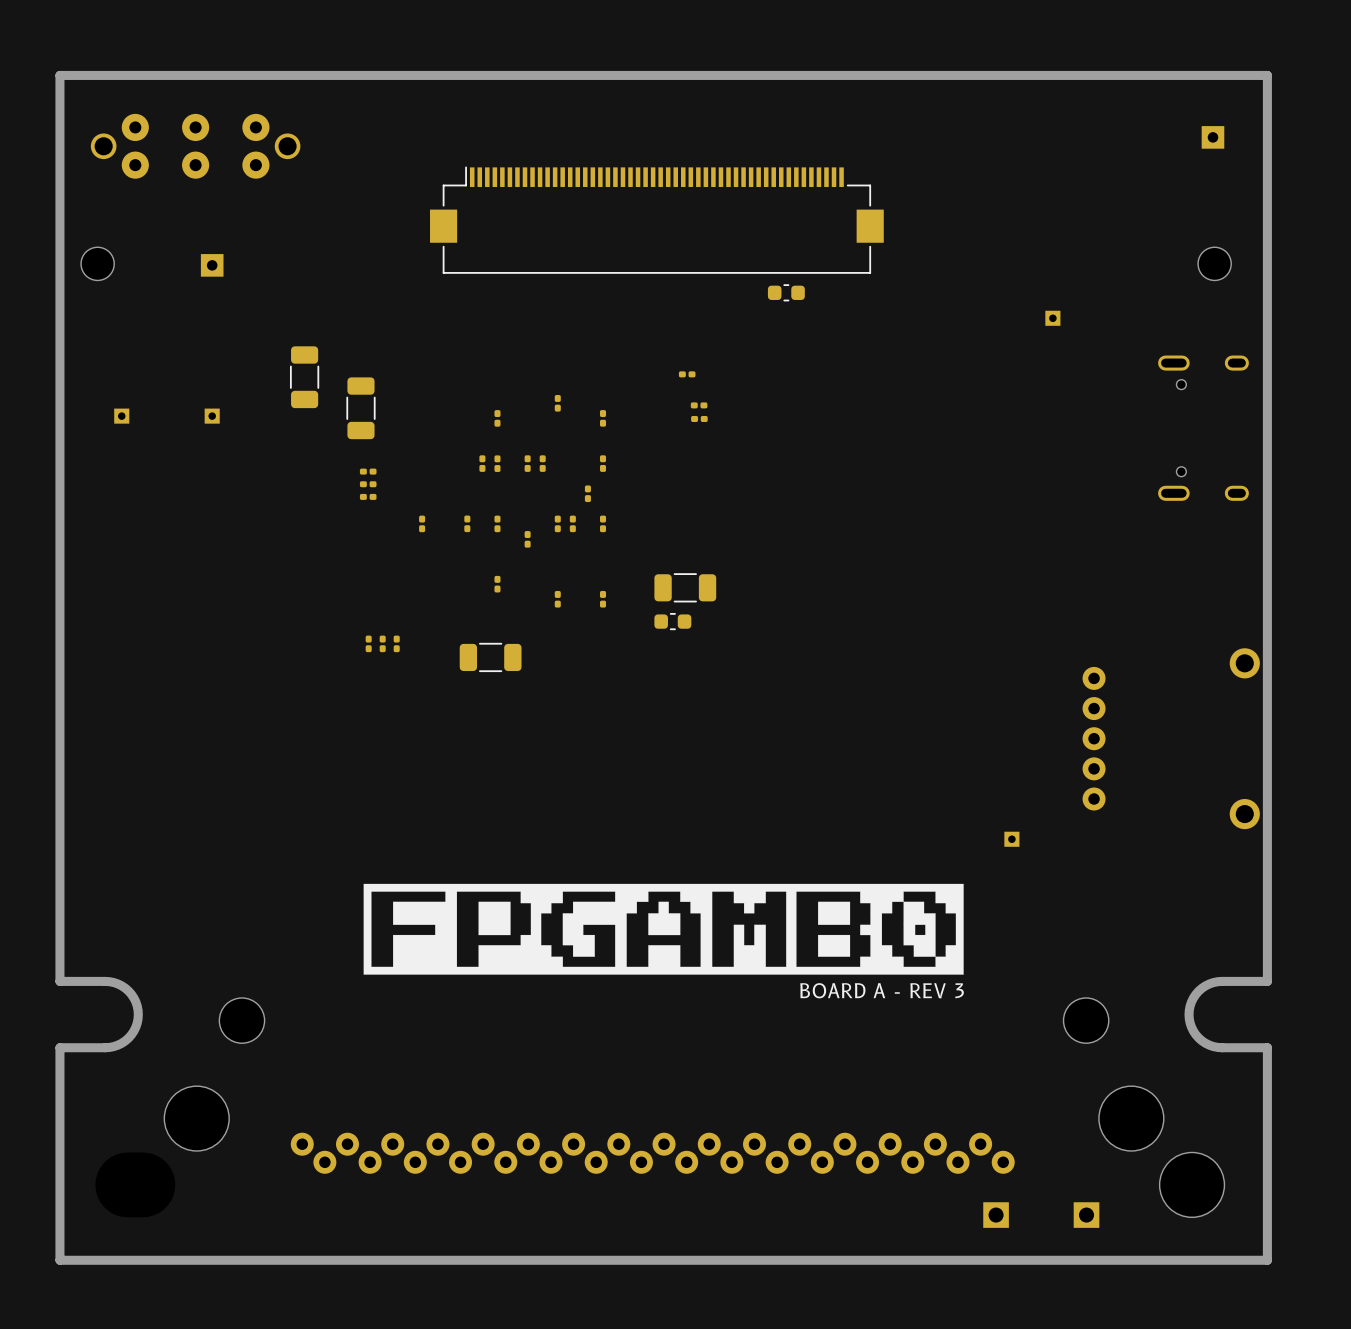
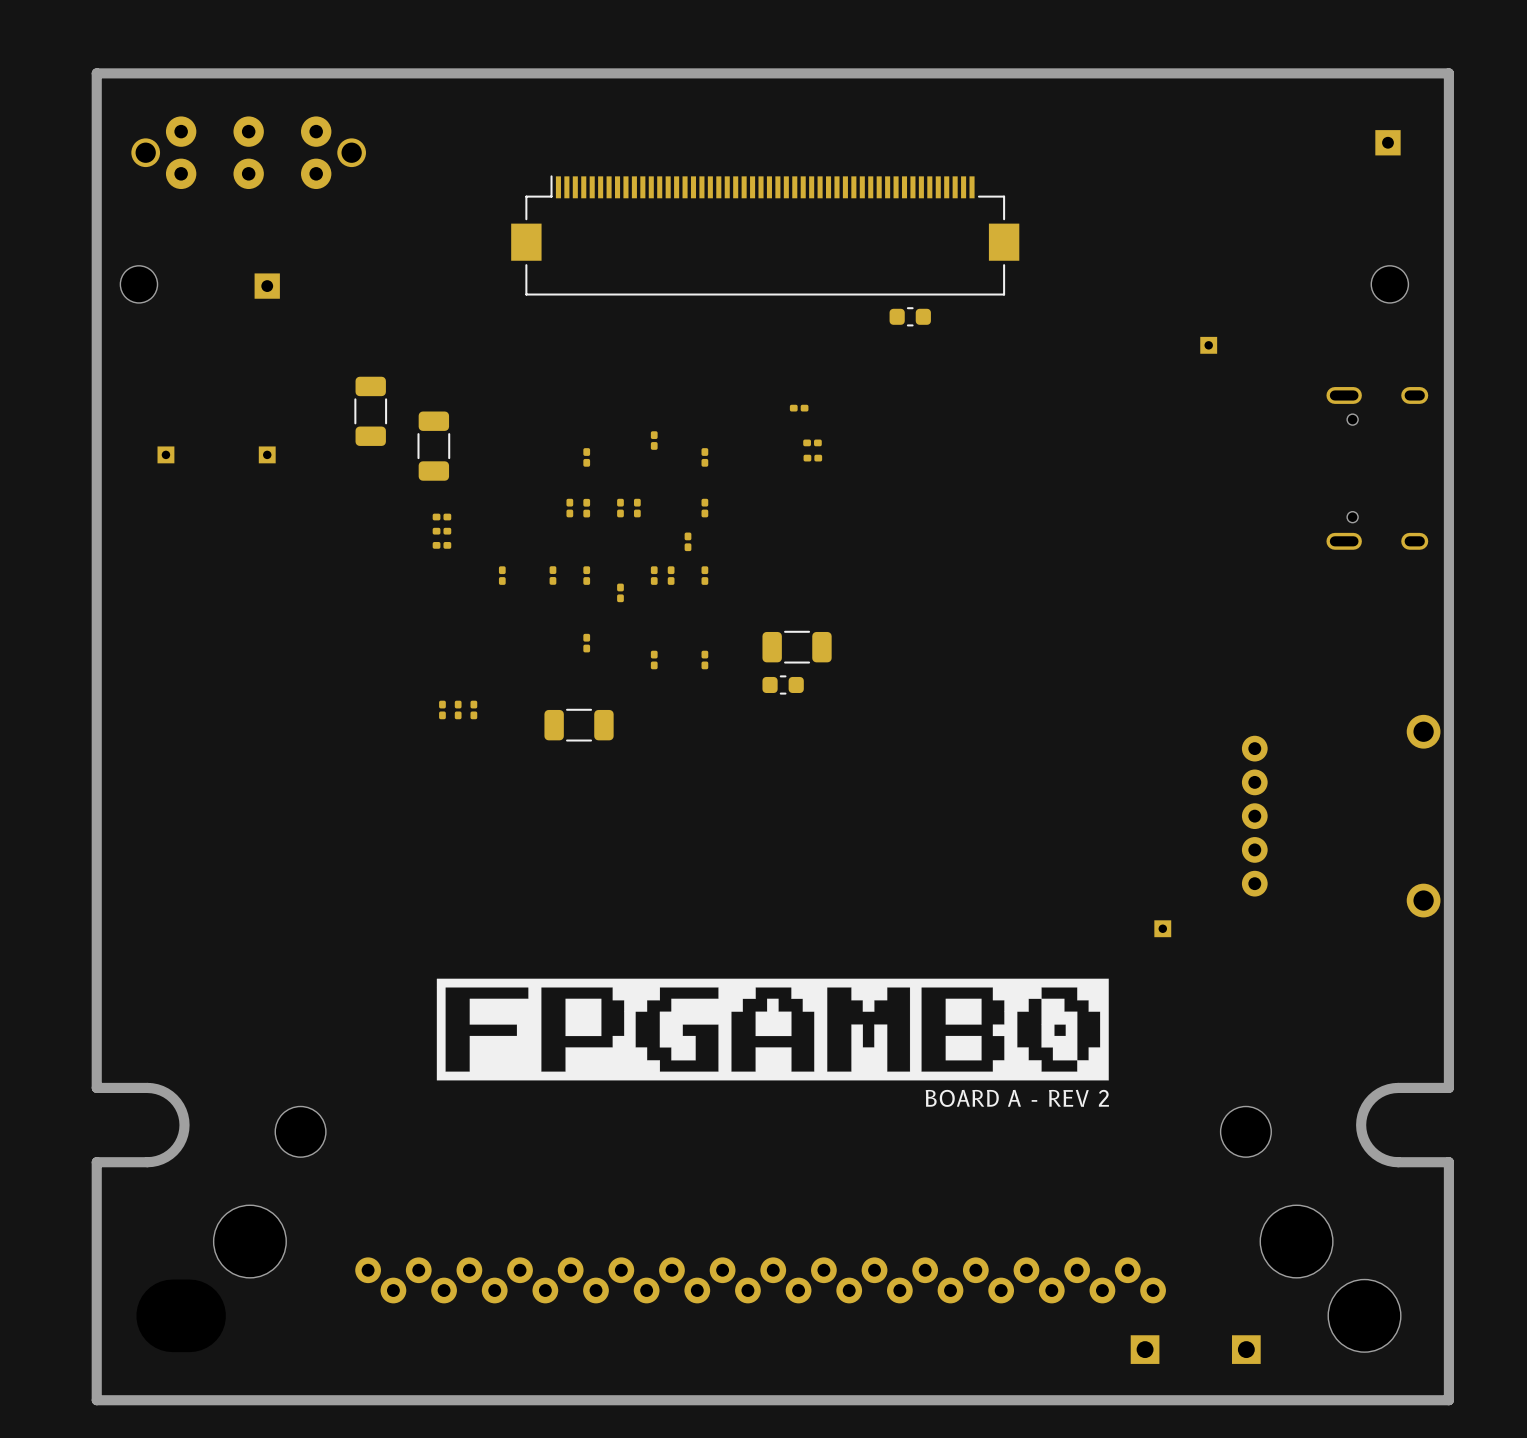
text: BOARD A - REV 3 (882, 990) -> BOARD A - REV 2 (1017, 1098)

